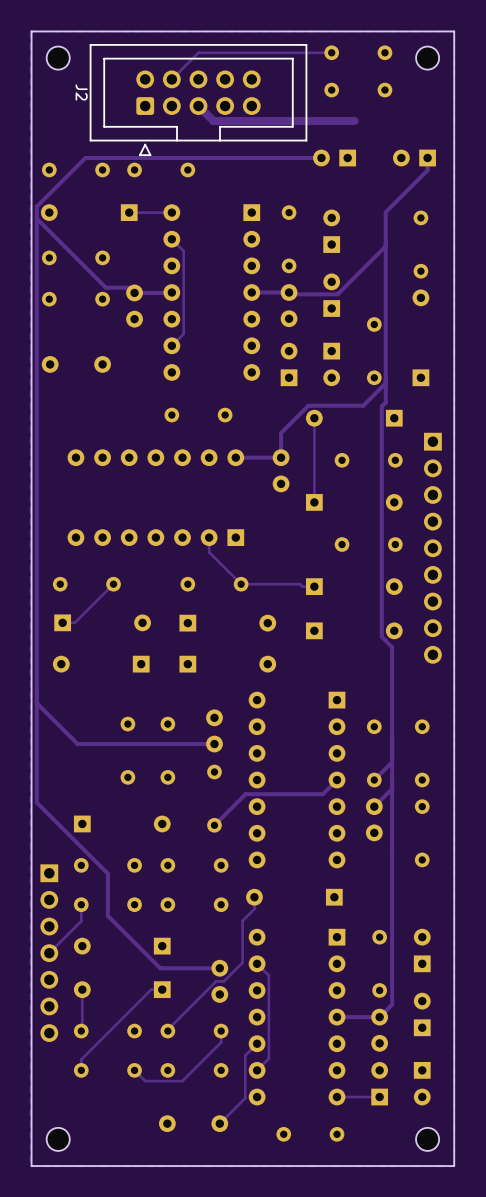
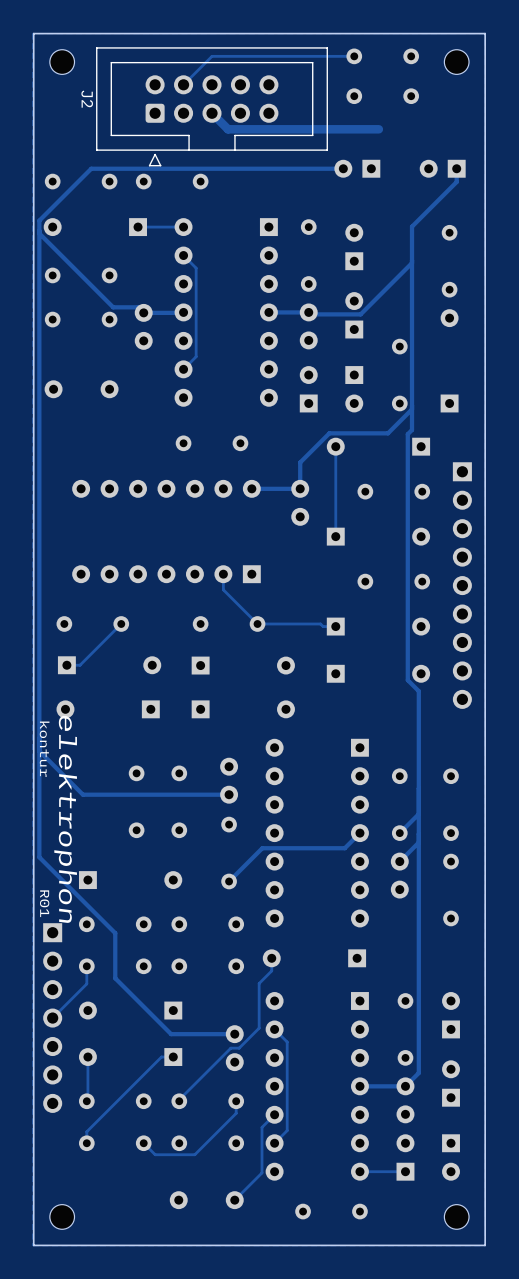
drawing: none -> [39, 715, 77, 924]

